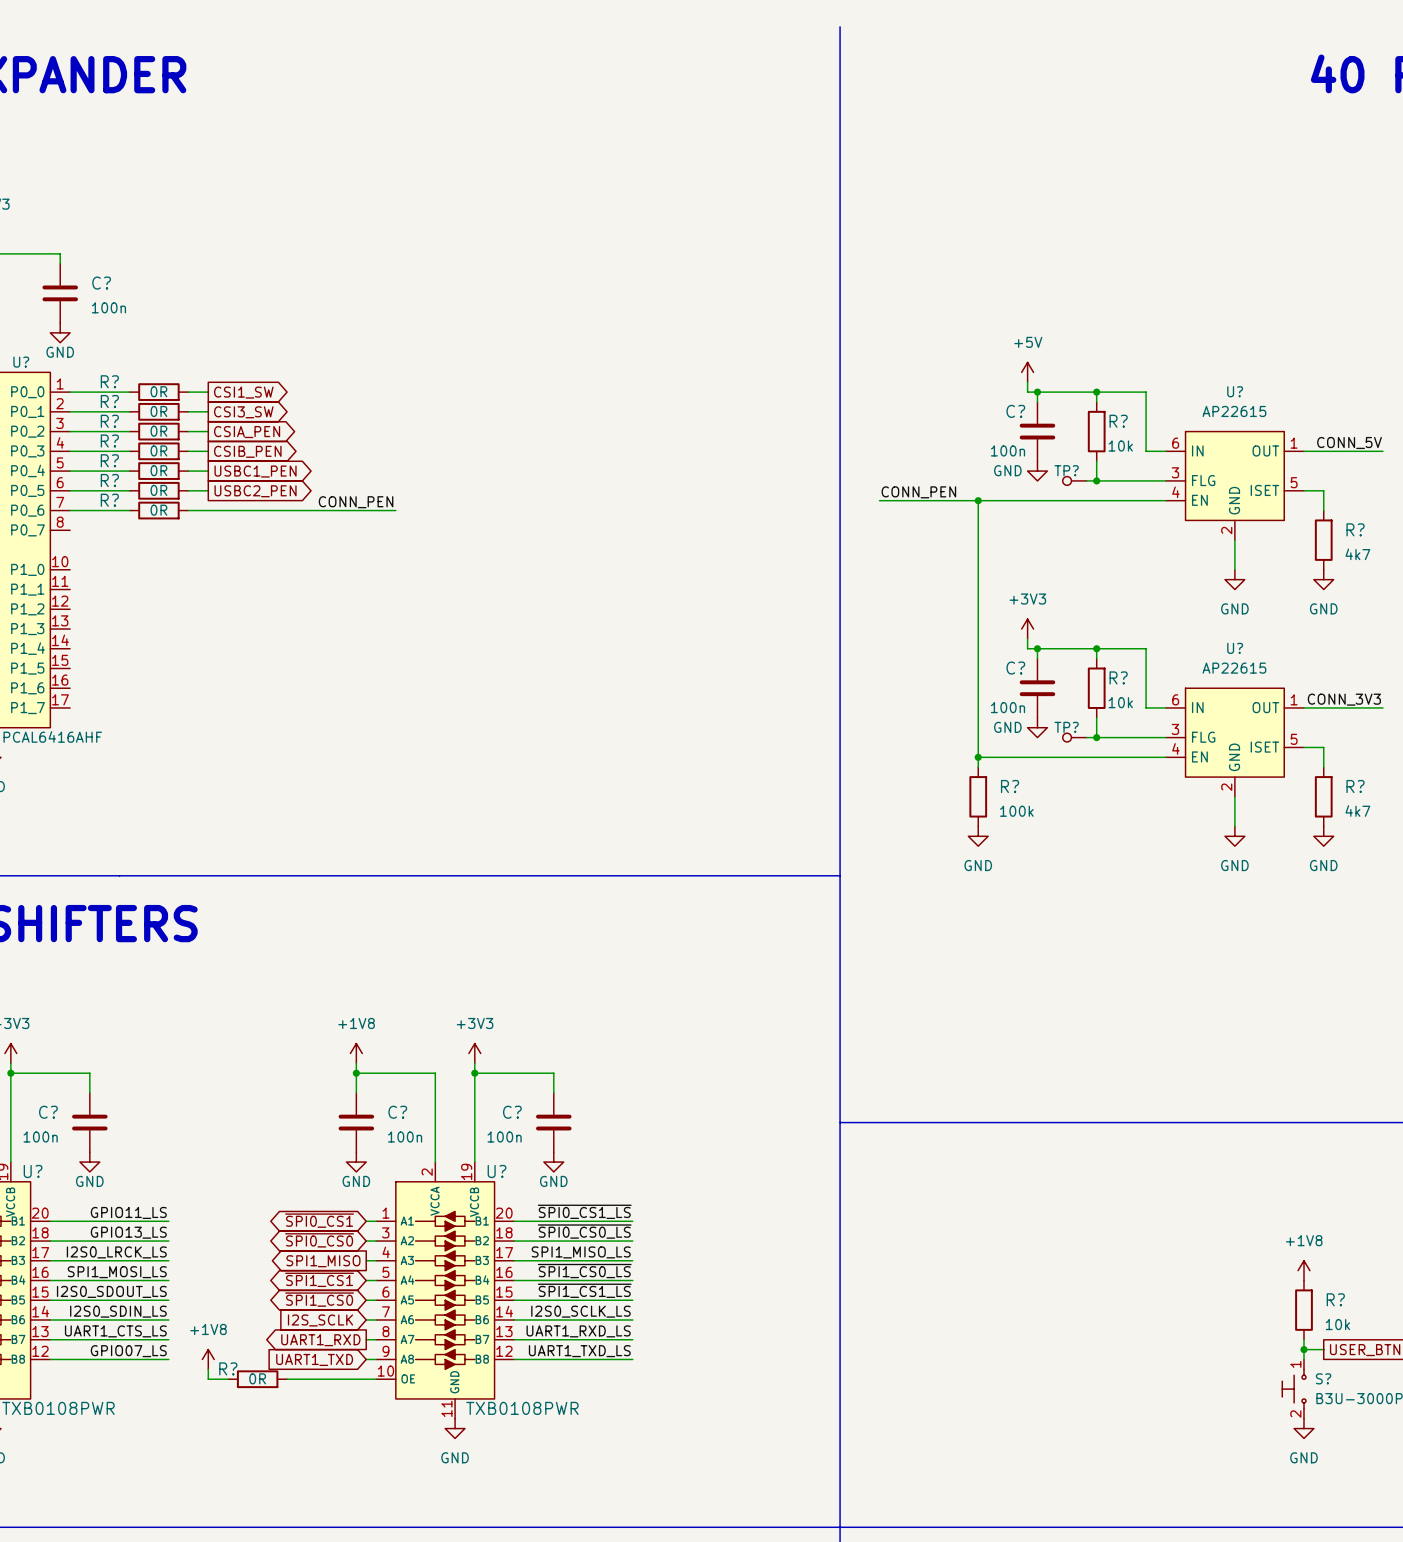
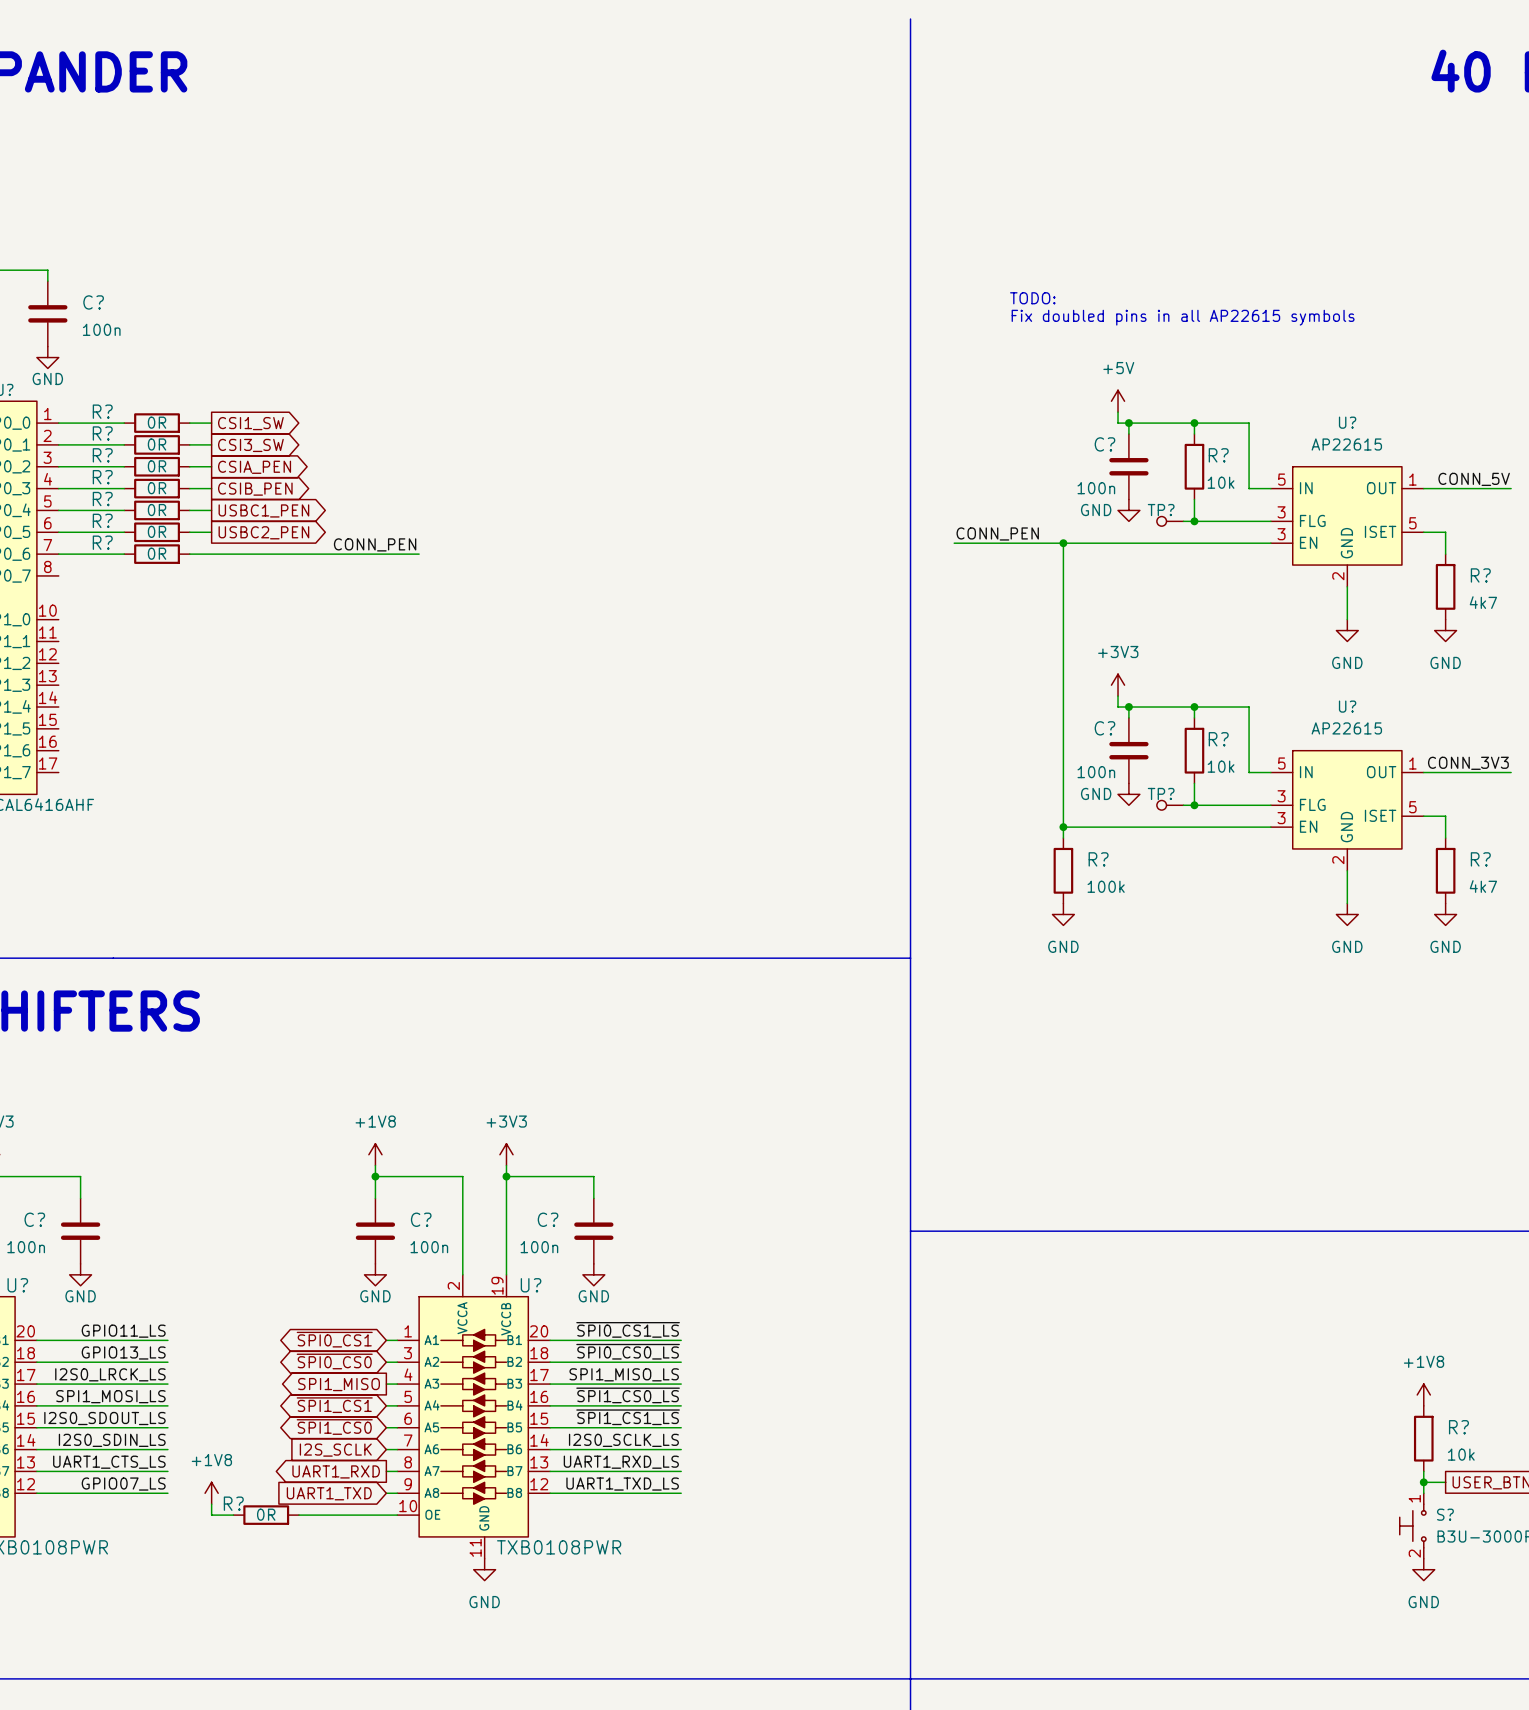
text: none -> TODO: (1032, 298)
text: none -> Fix doubled pins in all AP22615 symbols (1183, 317)
U? pin number: 6 (1175, 443) -> 5 (1281, 479)
U? pin number: 4 (1175, 492) -> 3 (1281, 534)
U? pin number: 6 (1175, 699) -> 5 (1281, 763)
U? pin number: 4 (1175, 748) -> 3 (1281, 818)

